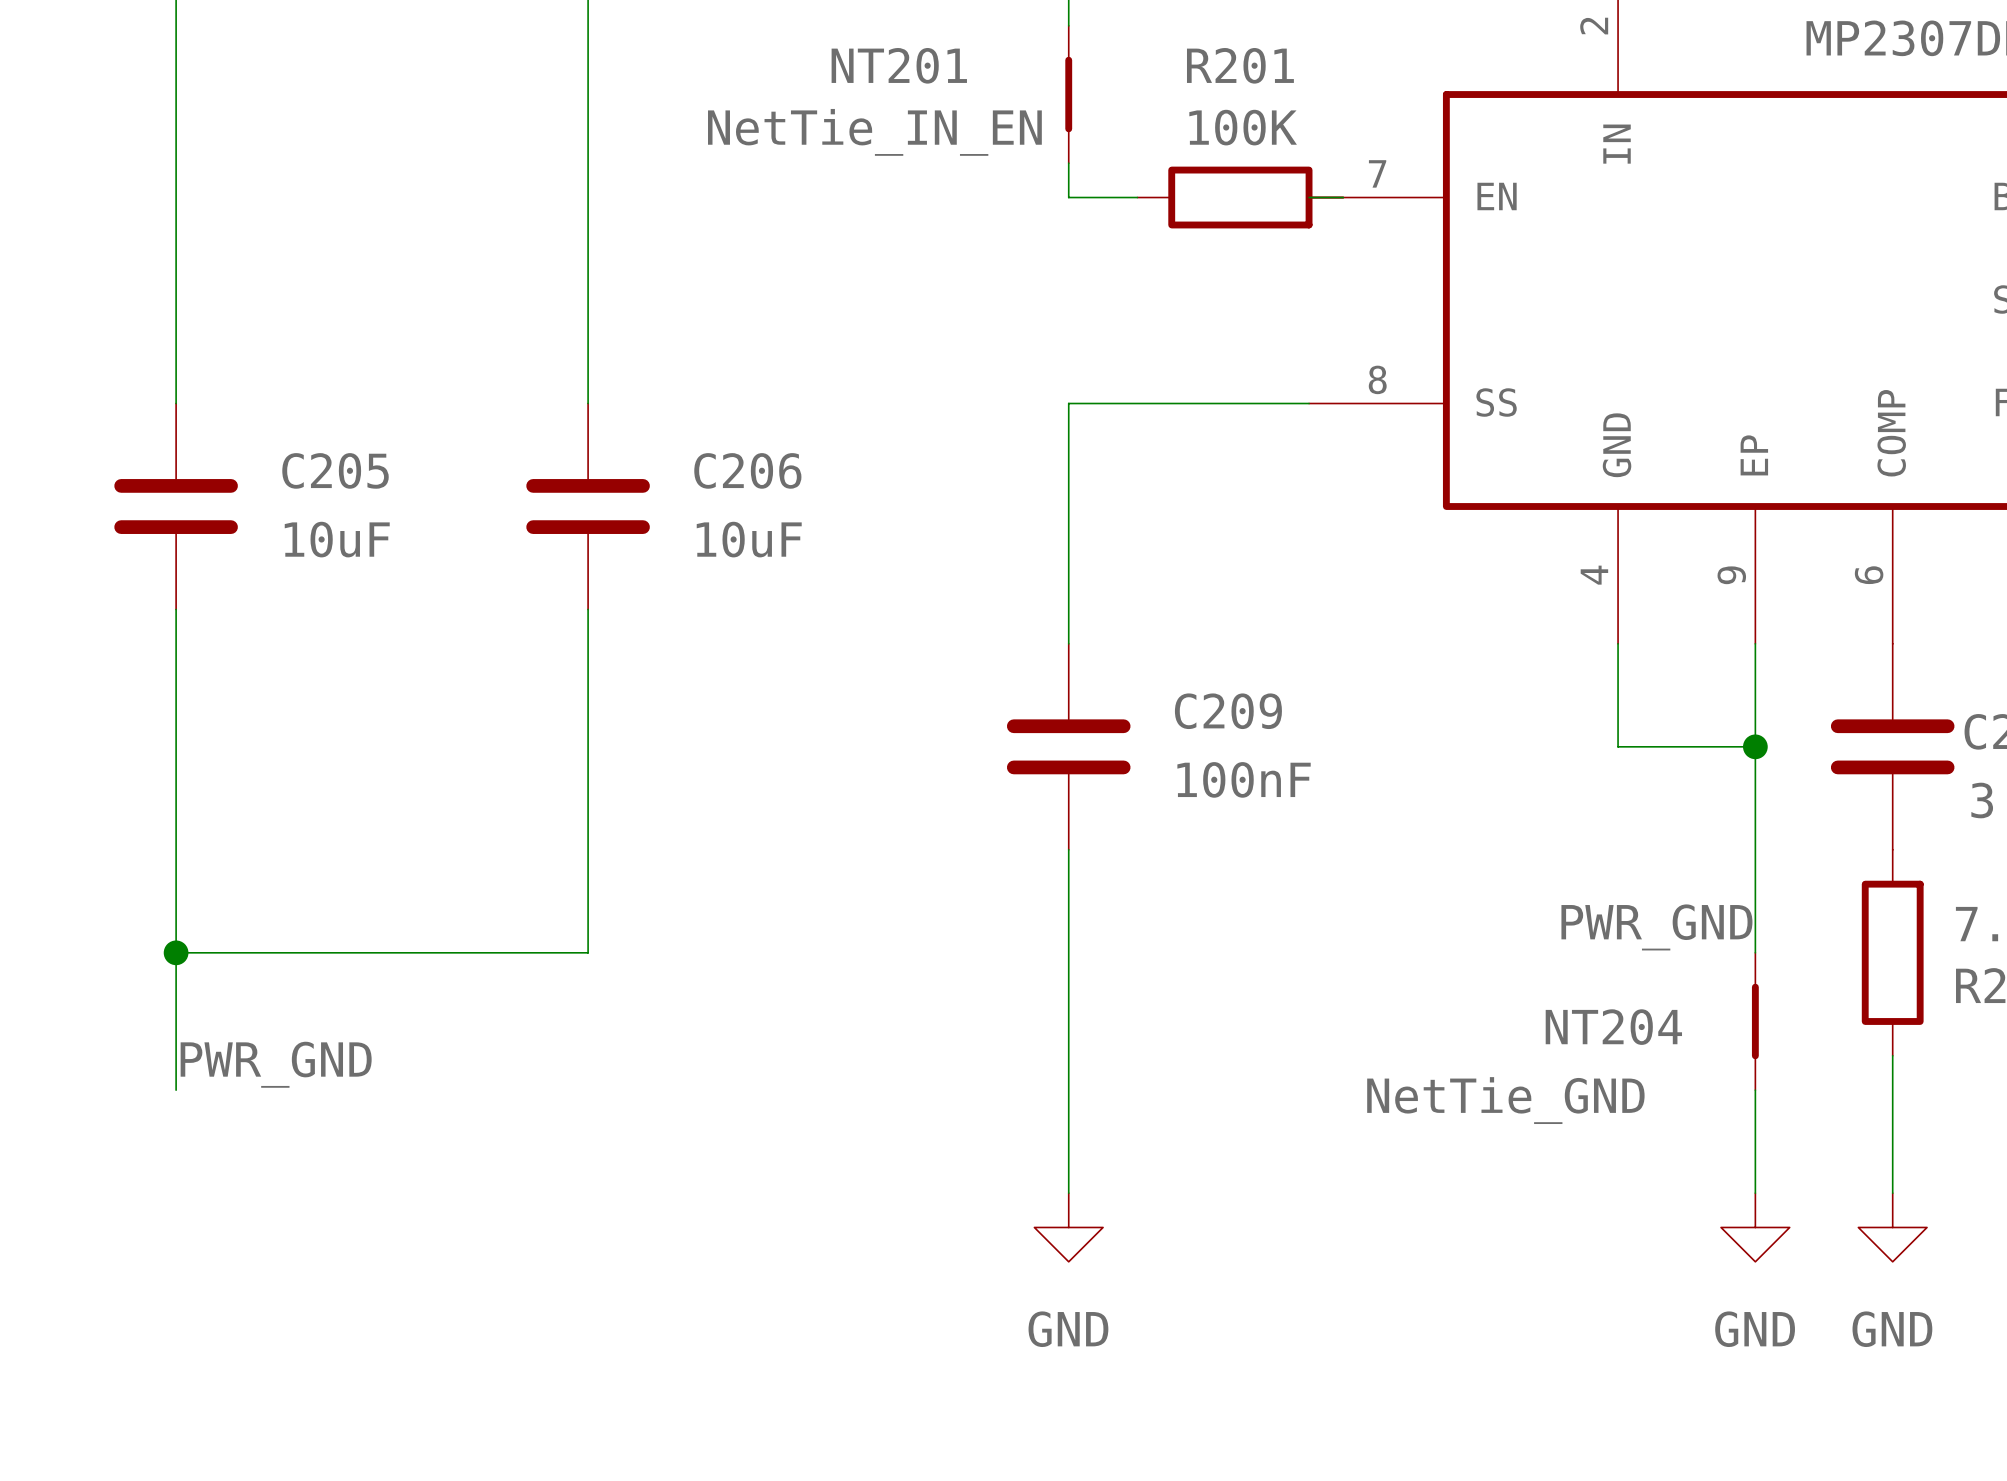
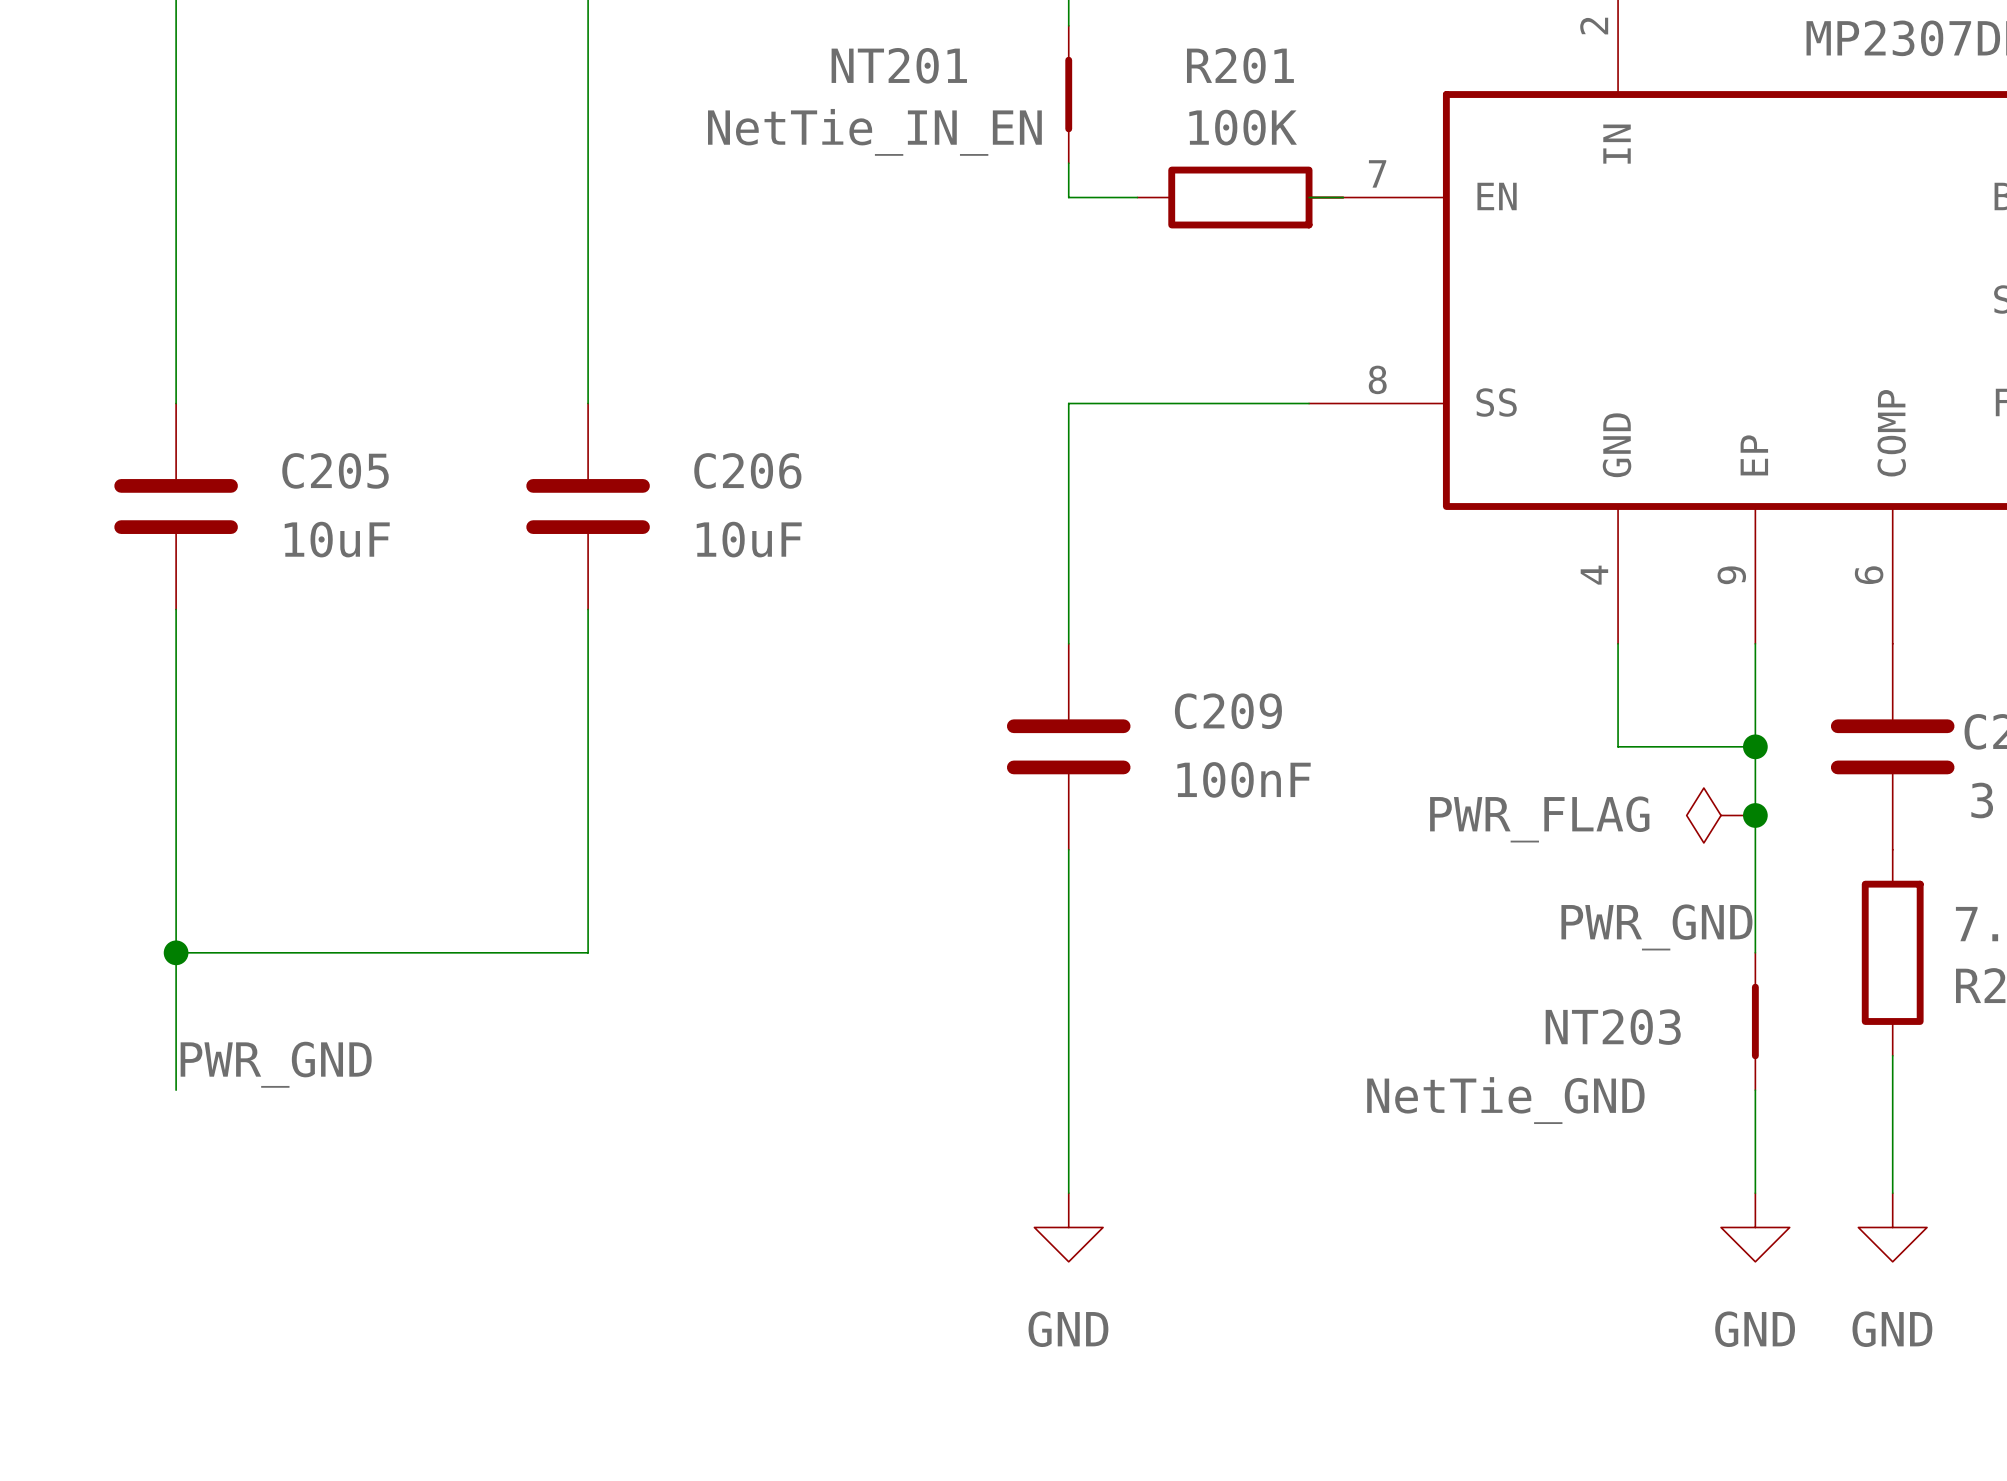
power symbol: none -> PWR_FLAG (1721, 815)
junction: none -> (1755, 815)
NT204 name: NT204 (1613, 1027) -> NT203 (1613, 1027)

